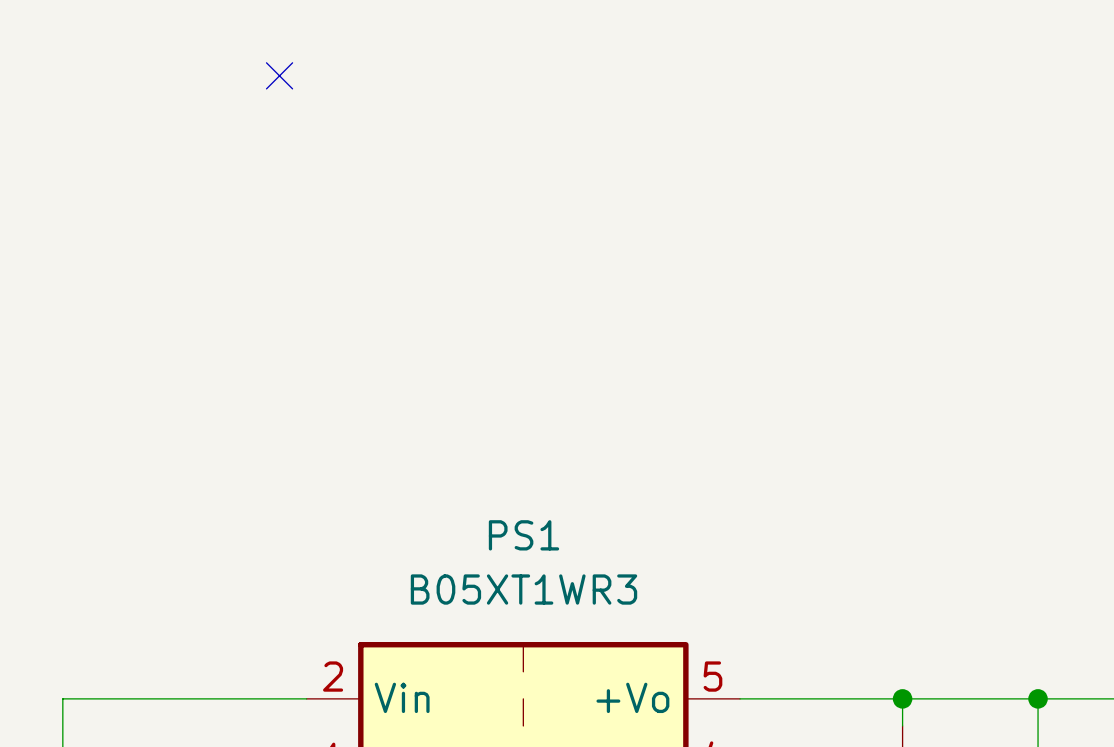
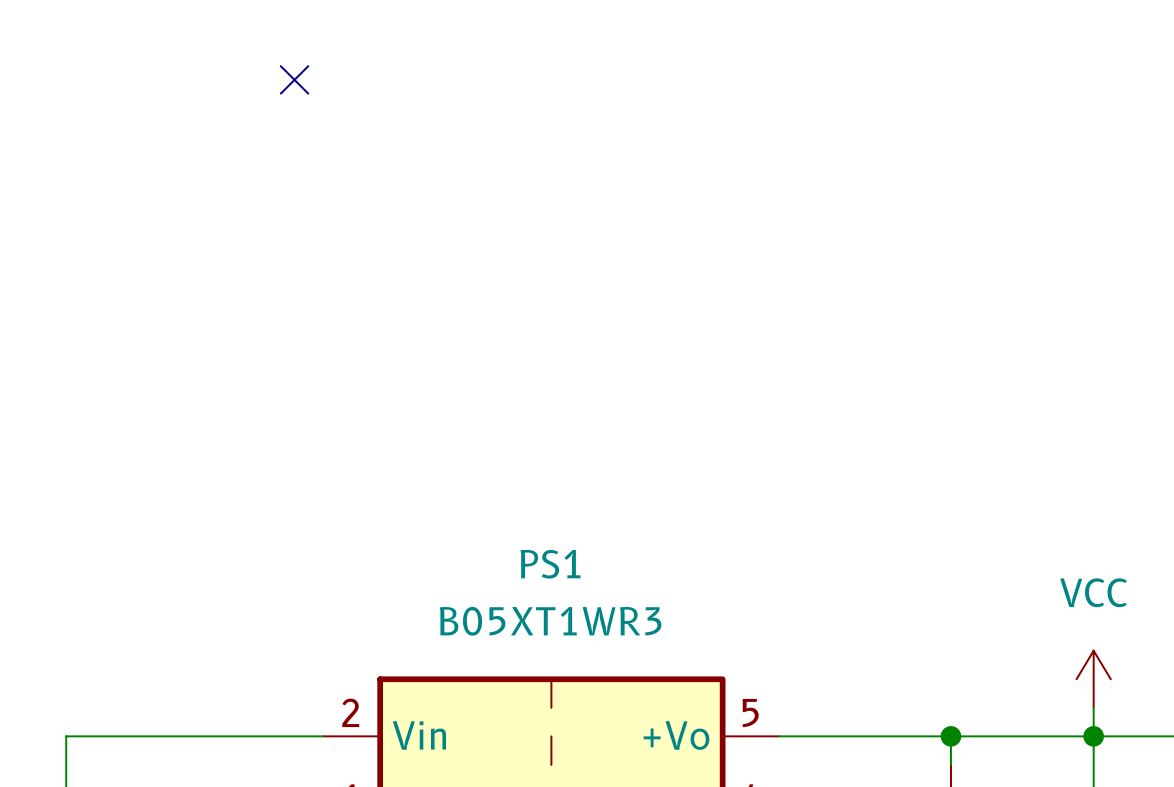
power symbol: none -> VCC (1093, 679)
wire: none -> (1093, 707) (1093, 736)

